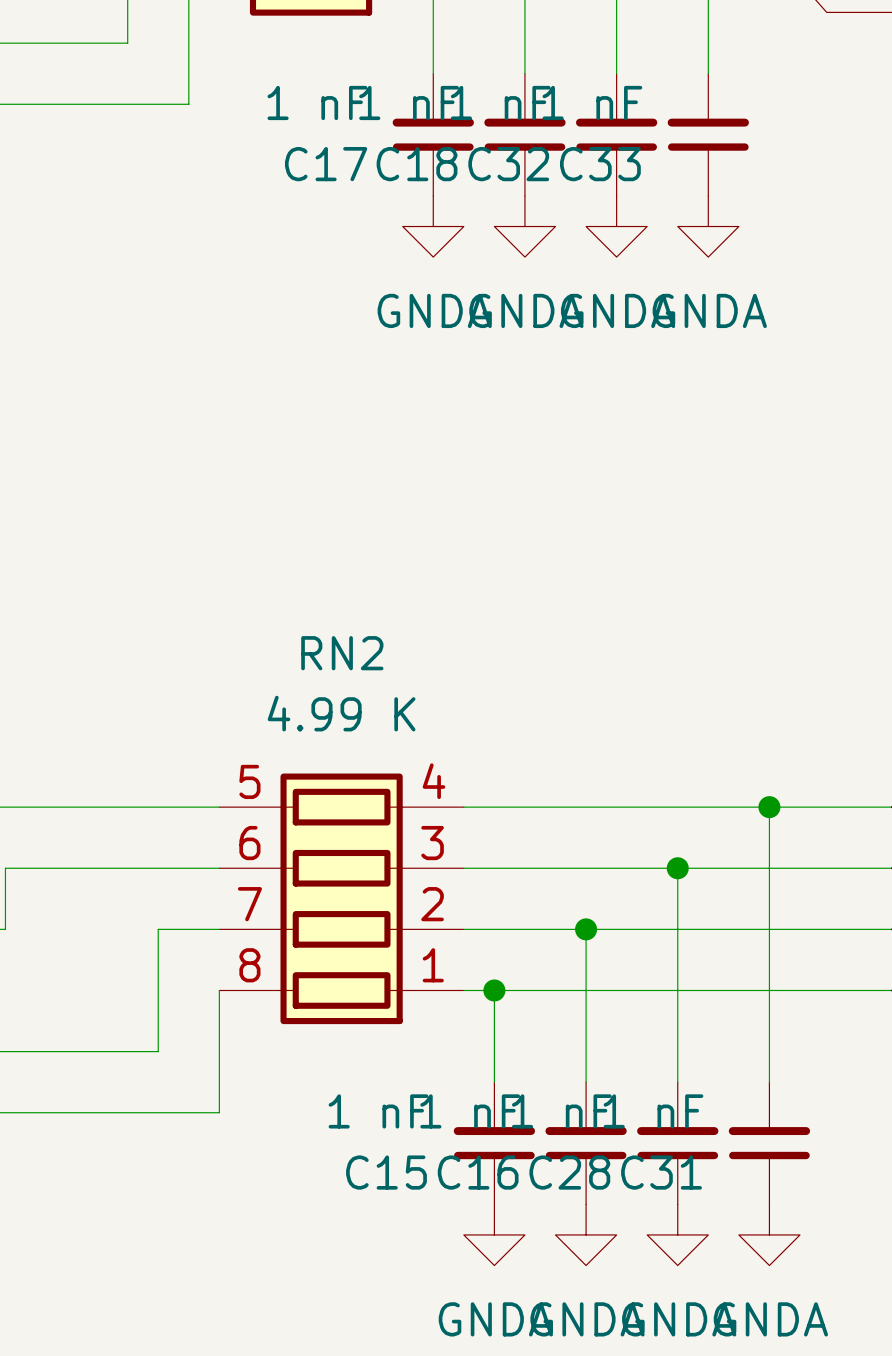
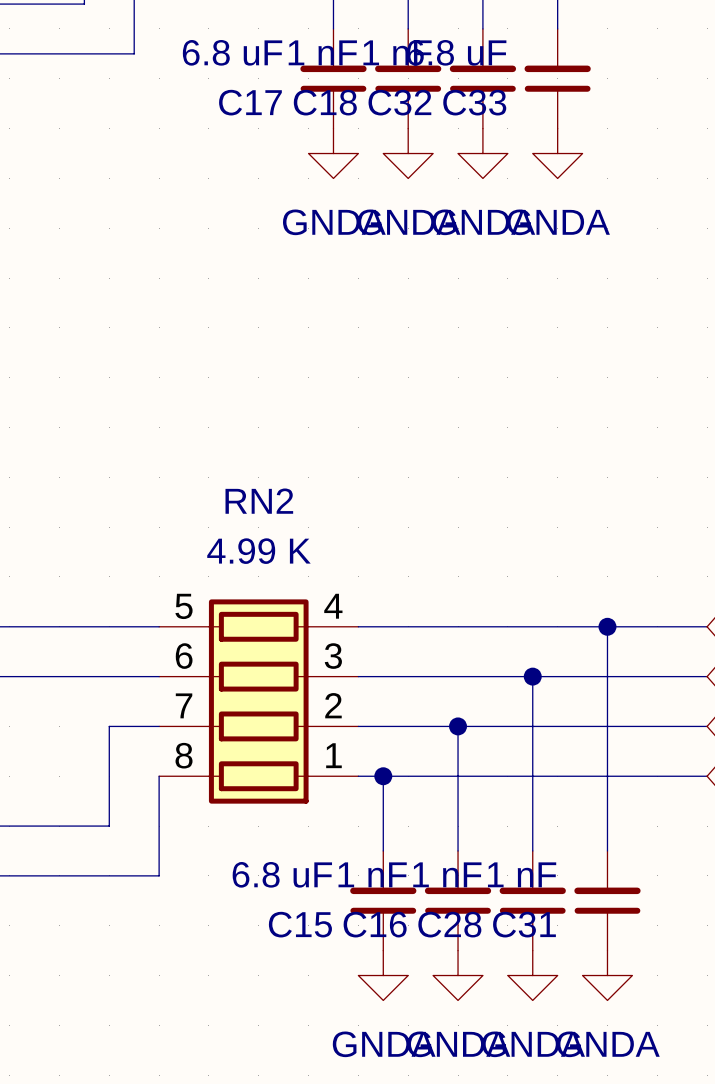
C17 value: 1 nF (317, 102) -> 6.8 uF (232, 52)
C33 value: 1 nF (592, 102) -> 6.8 uF (456, 52)
C15 value: 1 nF (378, 1111) -> 6.8 uF (282, 874)

